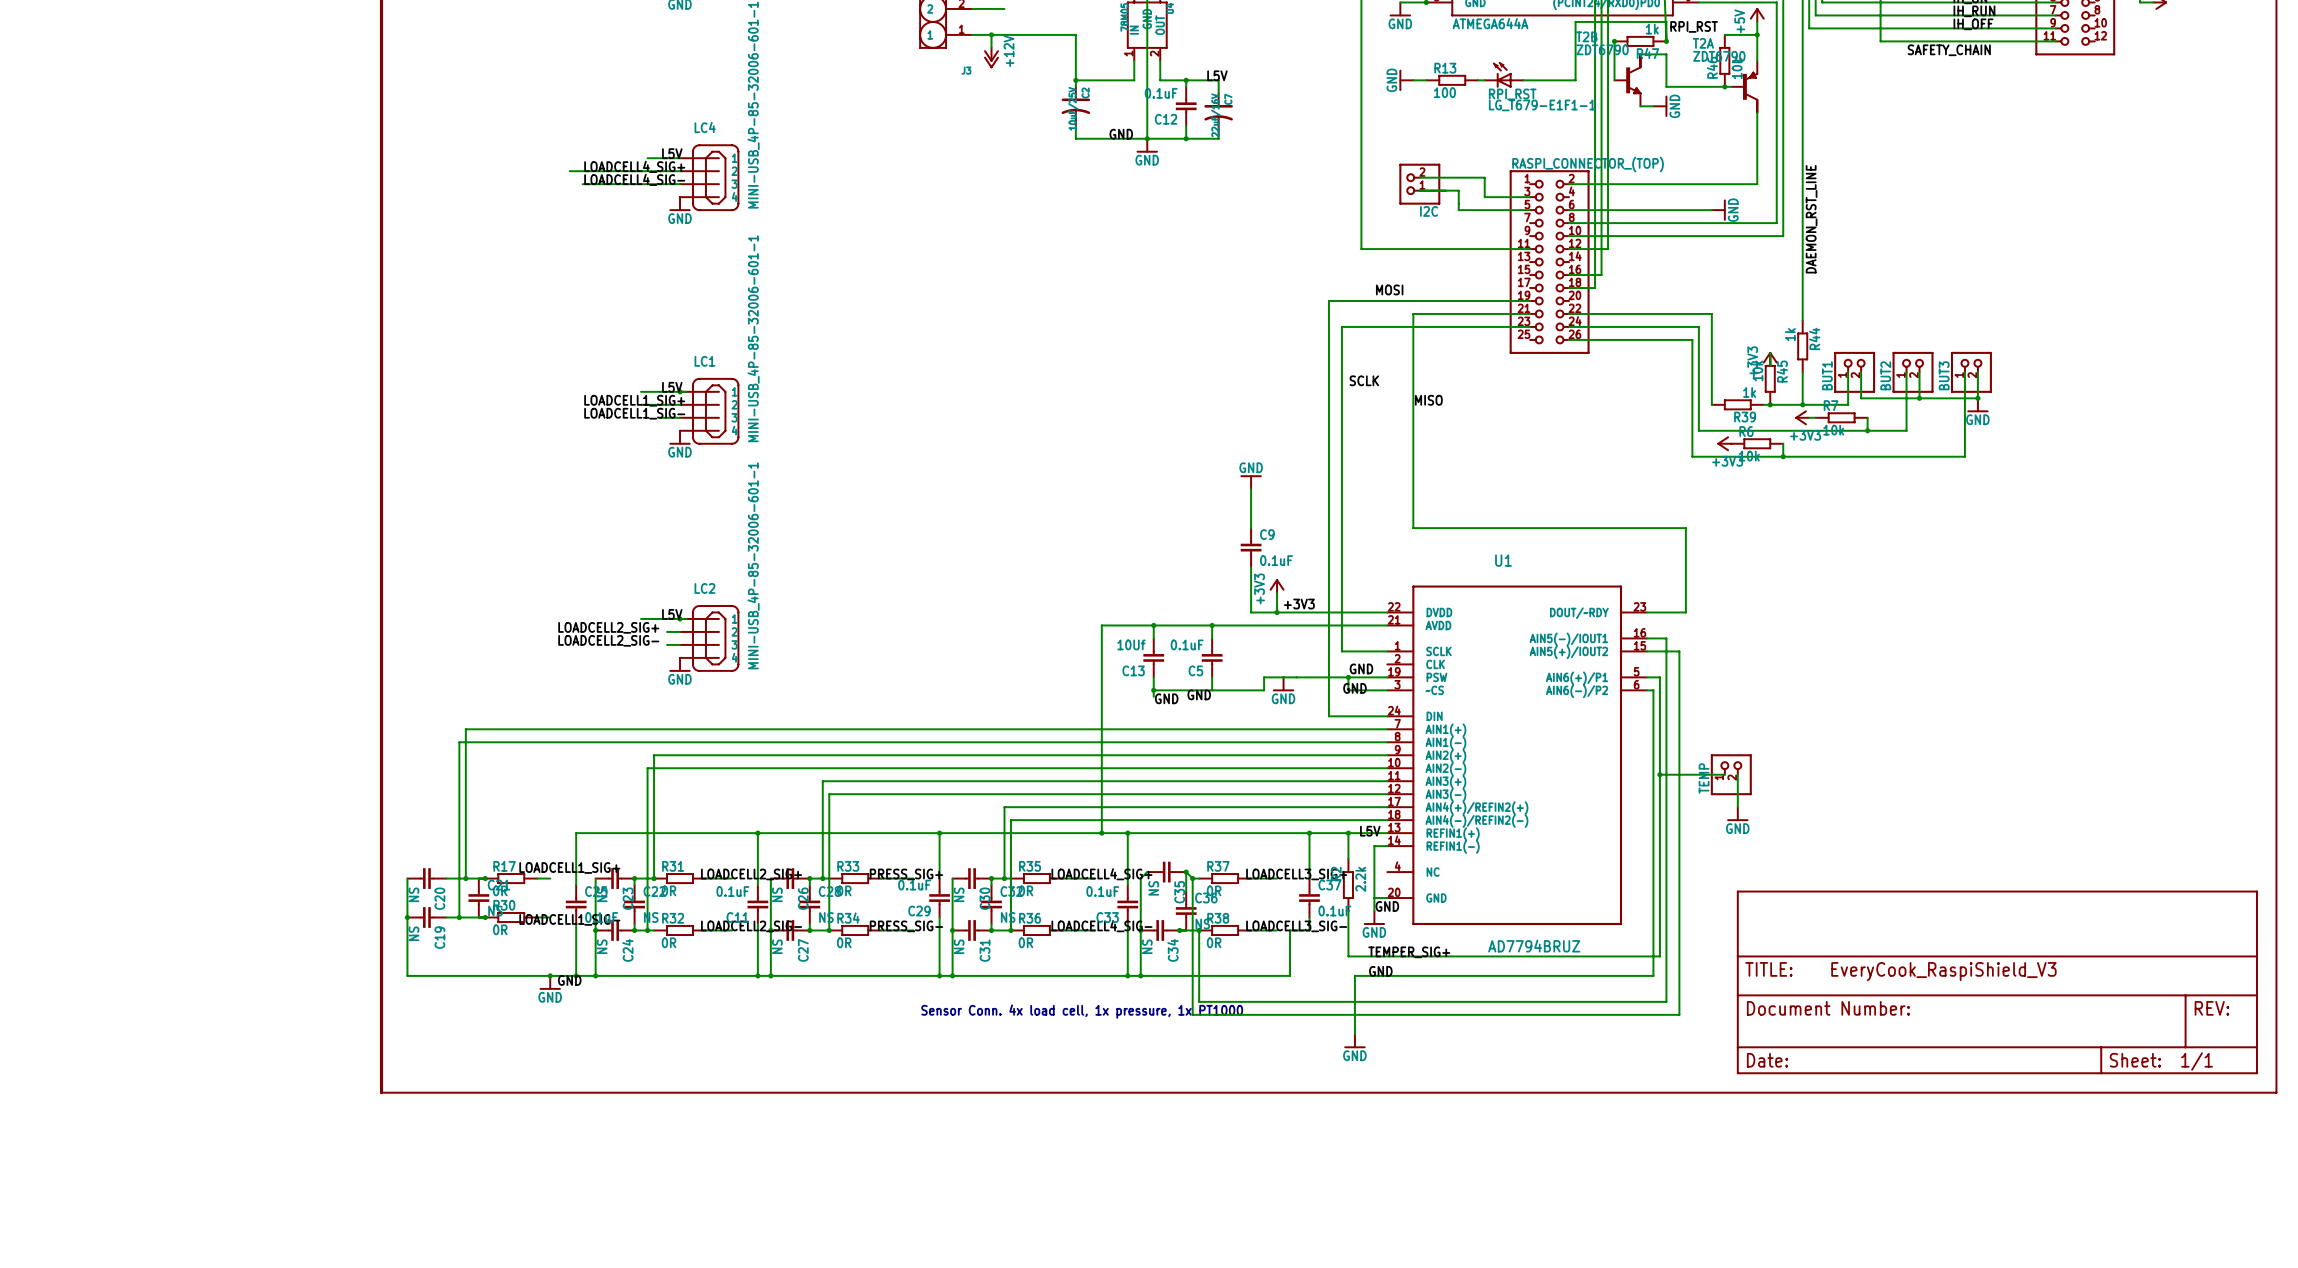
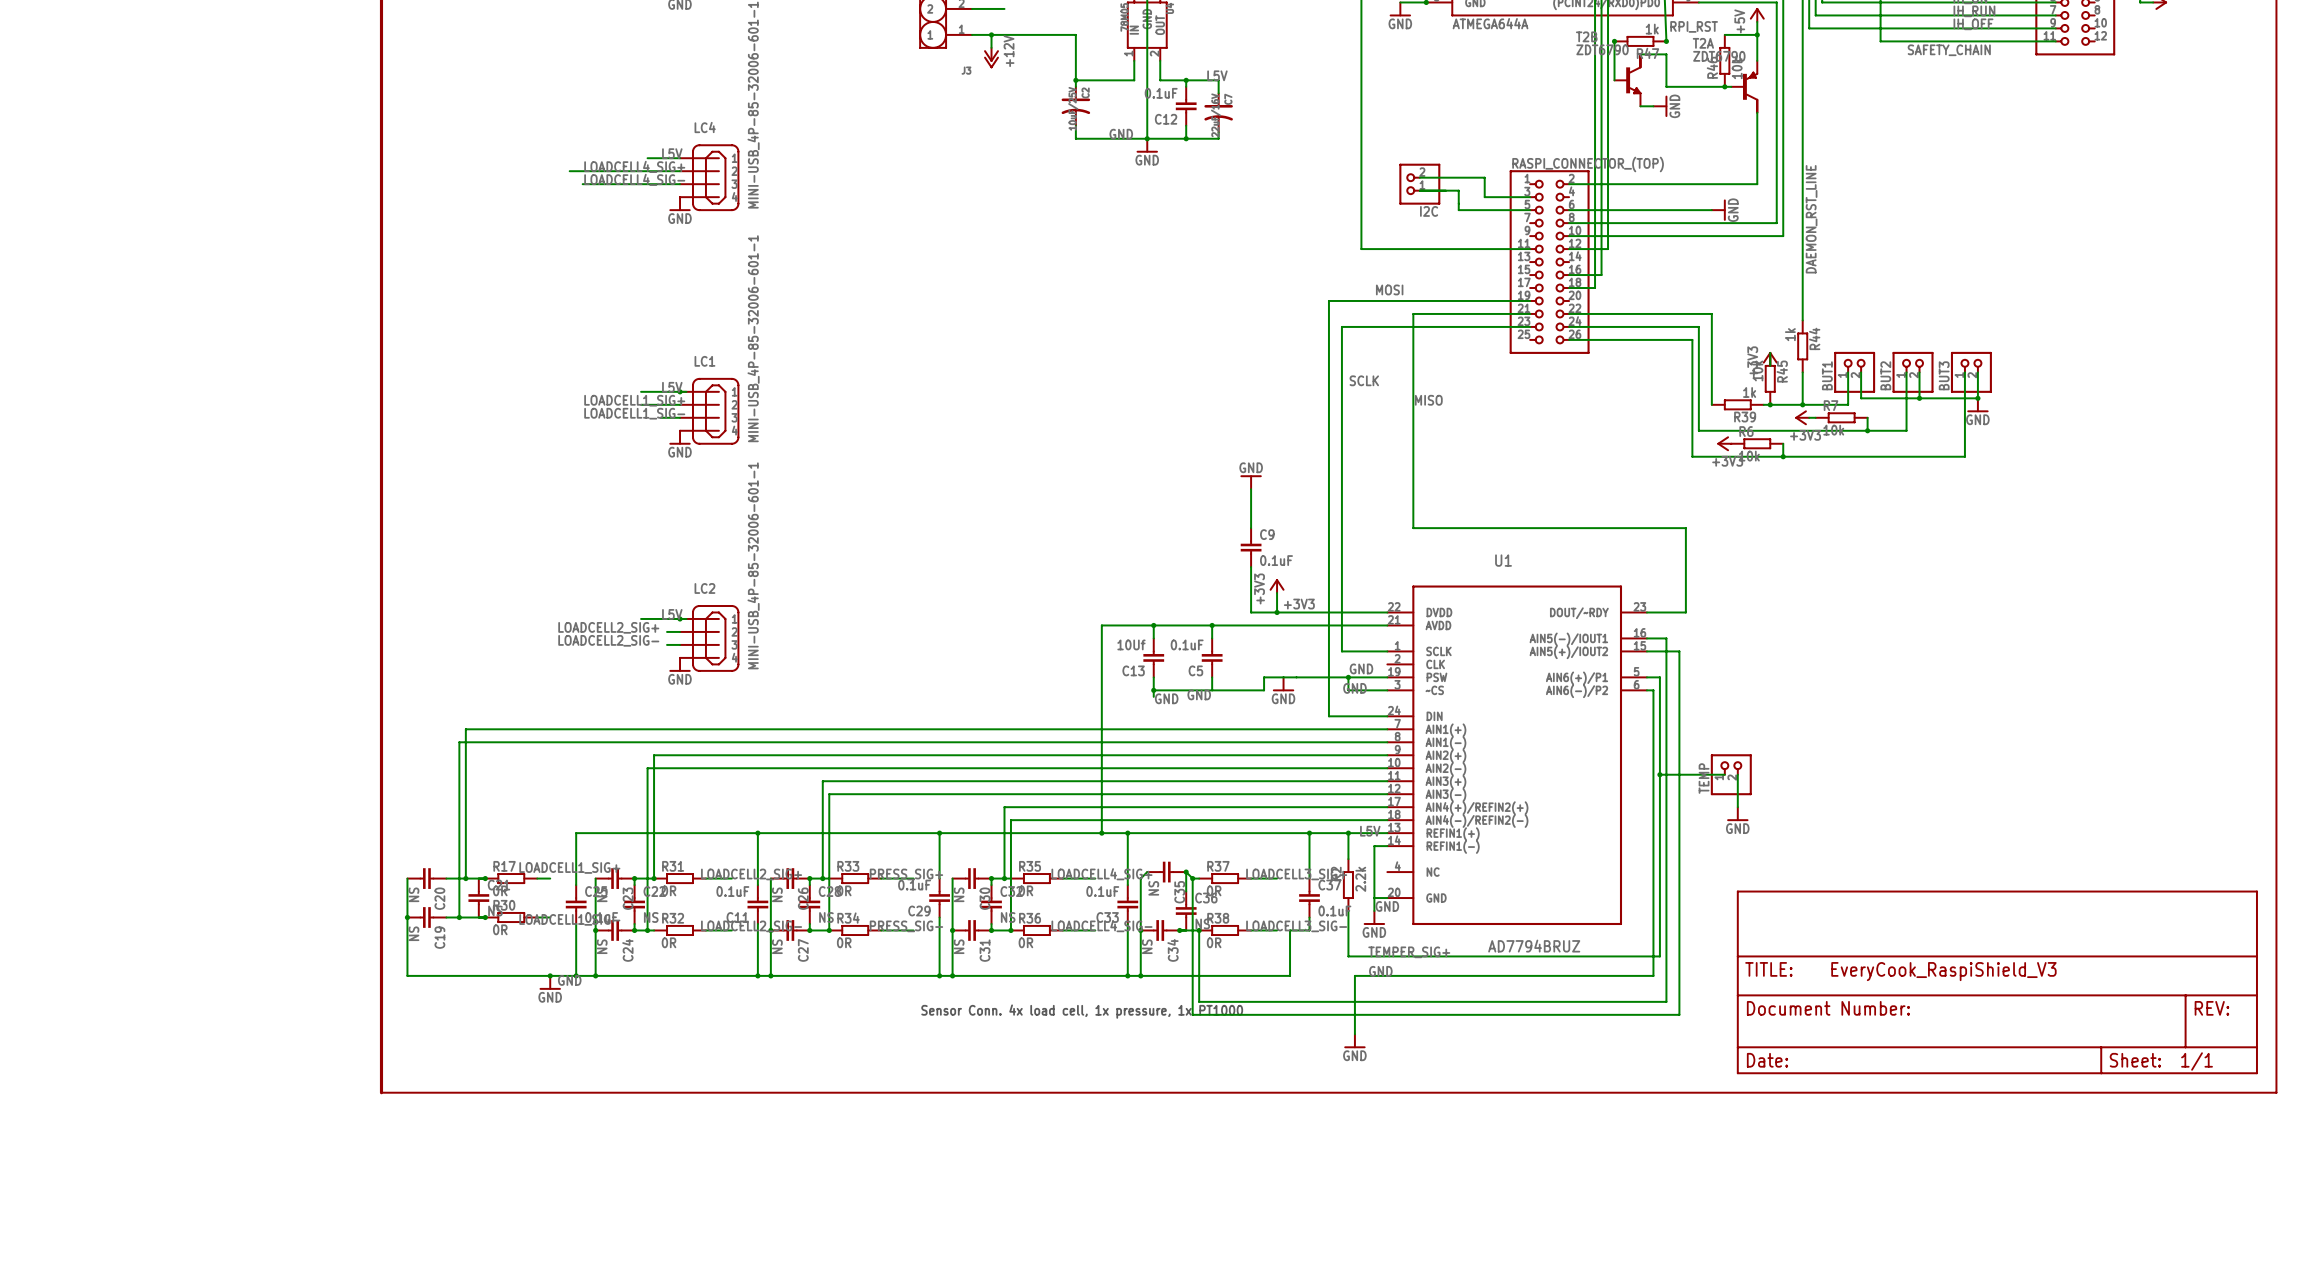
wire: (1666, 41) (1666, 21) (1575, 21) (1575, 80) (1523, 80) -> none
RPI_RST: LG_T679-E1F1-1 (1504, 74) -> none
power symbol: GND (1406, 80) -> none
wire: (1413, 80) (1426, 80) -> none
R13: 100 (1452, 80) -> none
wire: (1478, 80) (1484, 80) -> none

